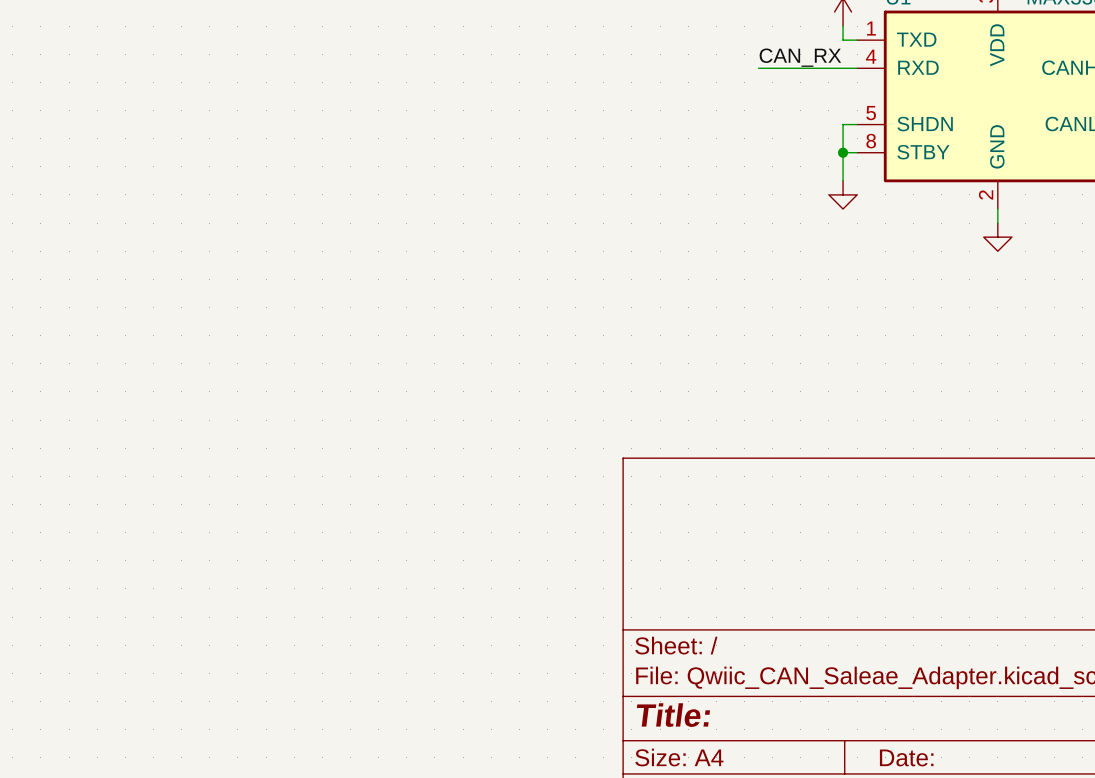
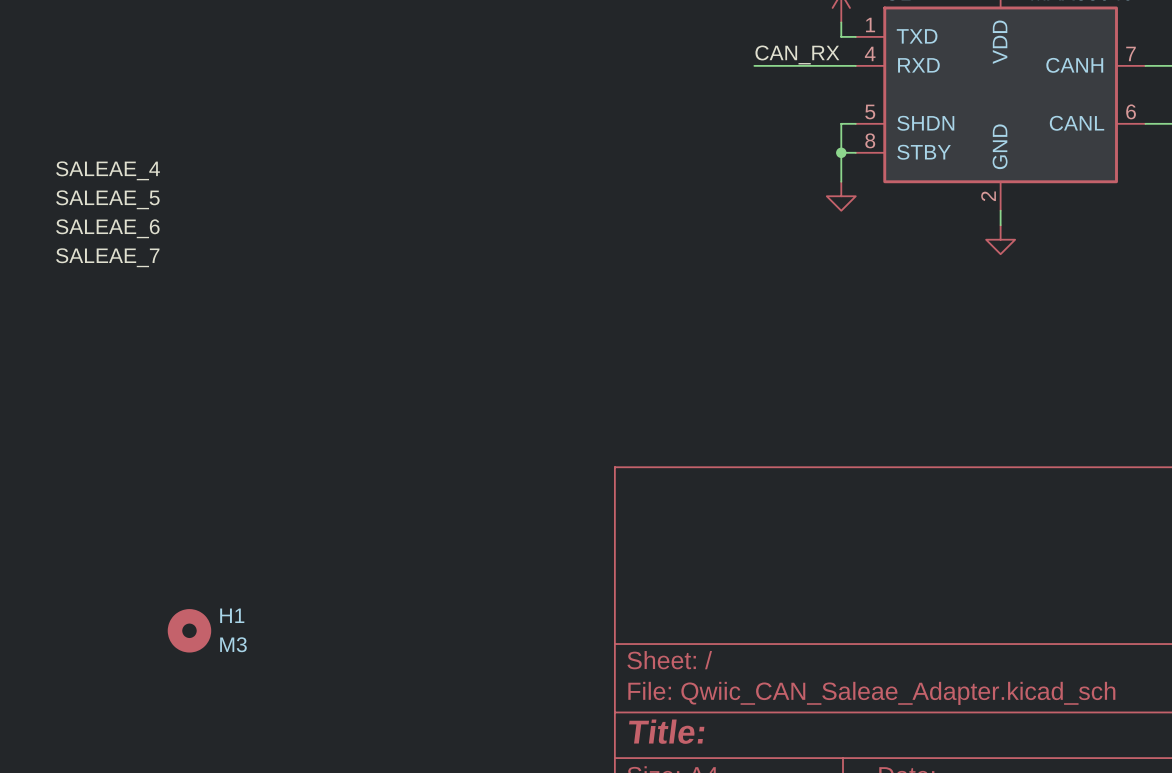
label: none -> SALEAE_4 (108, 170)
label: none -> SALEAE_5 (107, 199)
label: none -> SALEAE_6 (107, 228)
label: none -> SALEAE_7 (107, 257)
H1: none -> M3 (189, 630)

